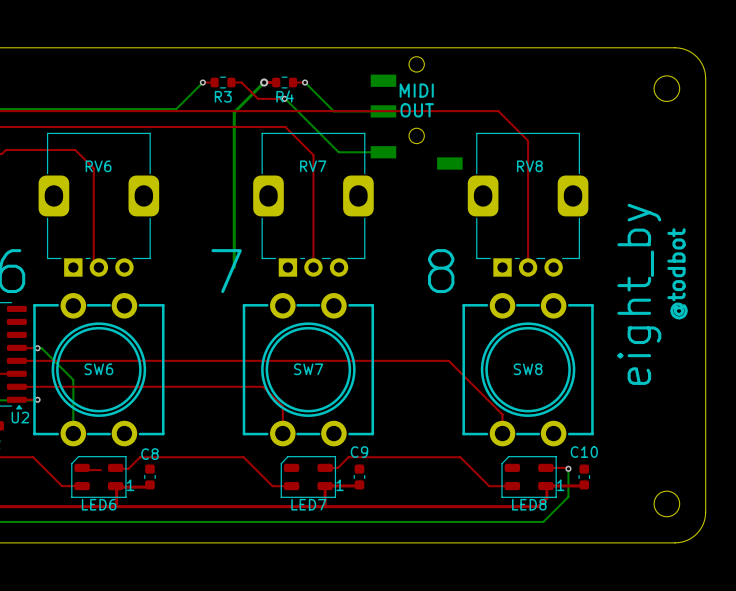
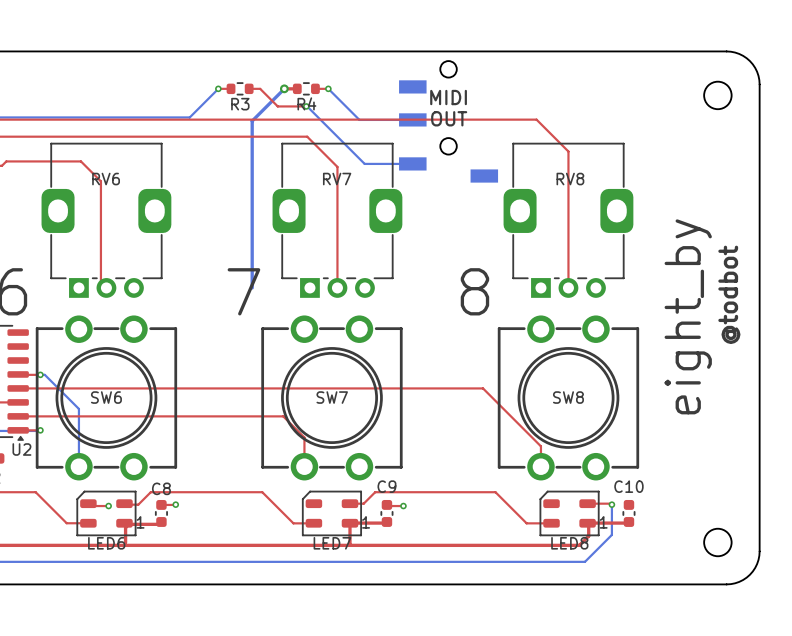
top track: none -> (175, 504) (161, 504)
via: none -> (175, 504)
via: none -> (108, 506)
top track: none -> (386, 506) (403, 506)
via: none -> (403, 506)

